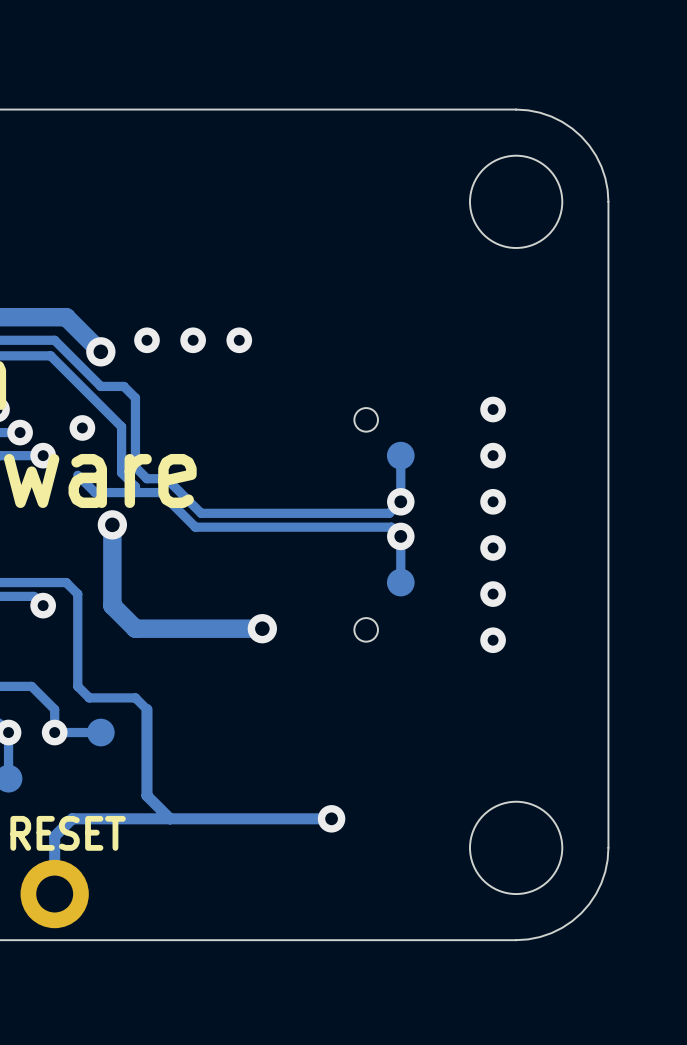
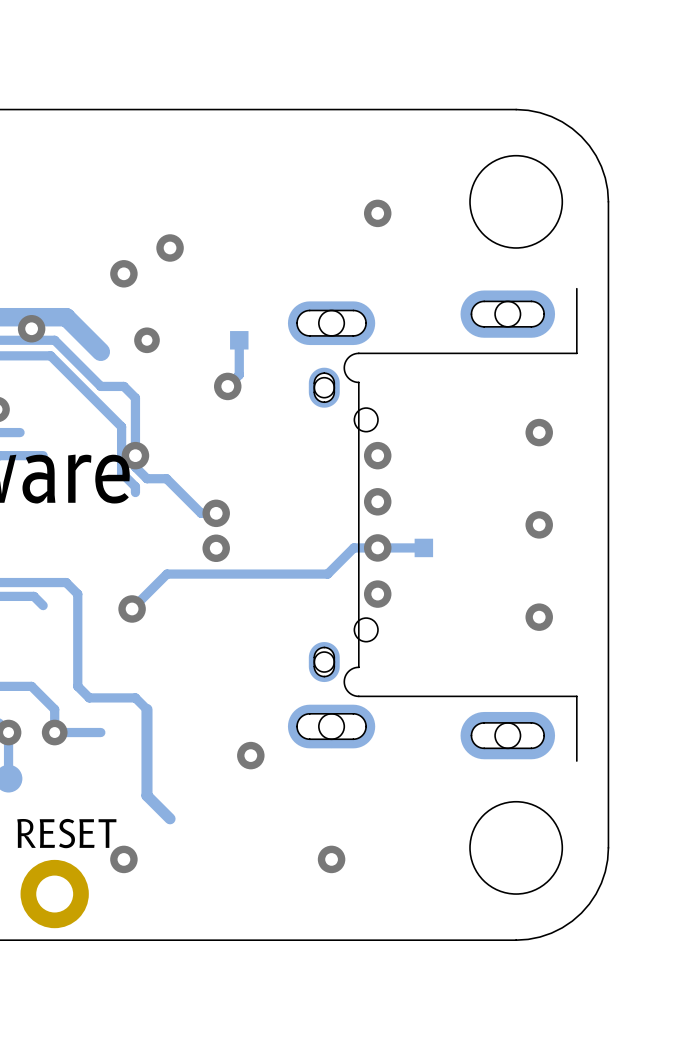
via: none -> (377, 213)
via: none -> (170, 247)
via: none -> (123, 273)
via: none -> (31, 328)
via: (193, 340) -> none
track: none -> (239, 340) (239, 374) (227, 386)
part: none -> (239, 340)
via: (239, 340) -> none
via: (100, 351) -> none
via: none -> (227, 386)
via: (493, 409) -> none
via: (82, 427) -> none
via: (20, 432) -> none
via: none -> (539, 432)
via: (43, 455) -> none
via: none -> (135, 455)
via: none -> (377, 455)
track: (400, 455) (400, 501) (389, 513) (216, 513) -> none
part: (400, 455) -> none
via: (493, 455) -> none
track: (77, 475) (95, 492) (160, 492) (195, 527) (391, 527) (400, 536) (400, 582) -> none
via position: (400, 501) -> (377, 501)
via: (493, 501) -> none
via: none -> (216, 513)
track: (112, 524) (112, 605) (135, 628) (262, 628) -> none
via: (112, 524) -> none
part: none -> (432, 524)
via: none -> (539, 524)
via position: (400, 536) -> (377, 547)
track: none -> (423, 547) (353, 547) (327, 574) (167, 574) (132, 608)
part: none -> (423, 547)
via: (493, 547) -> none
via: none -> (216, 548)
part: (400, 582) -> none
via: none -> (377, 594)
via: (493, 594) -> none
via: (43, 605) -> none
via: none -> (132, 608)
via: none -> (539, 617)
via: (262, 628) -> none
via: (493, 640) -> none
part: (100, 732) -> none
via: none -> (250, 755)
track: (331, 818) (72, 818) (54, 836) (54, 894) -> none
via position: (331, 818) -> (331, 859)
via: none -> (123, 859)

